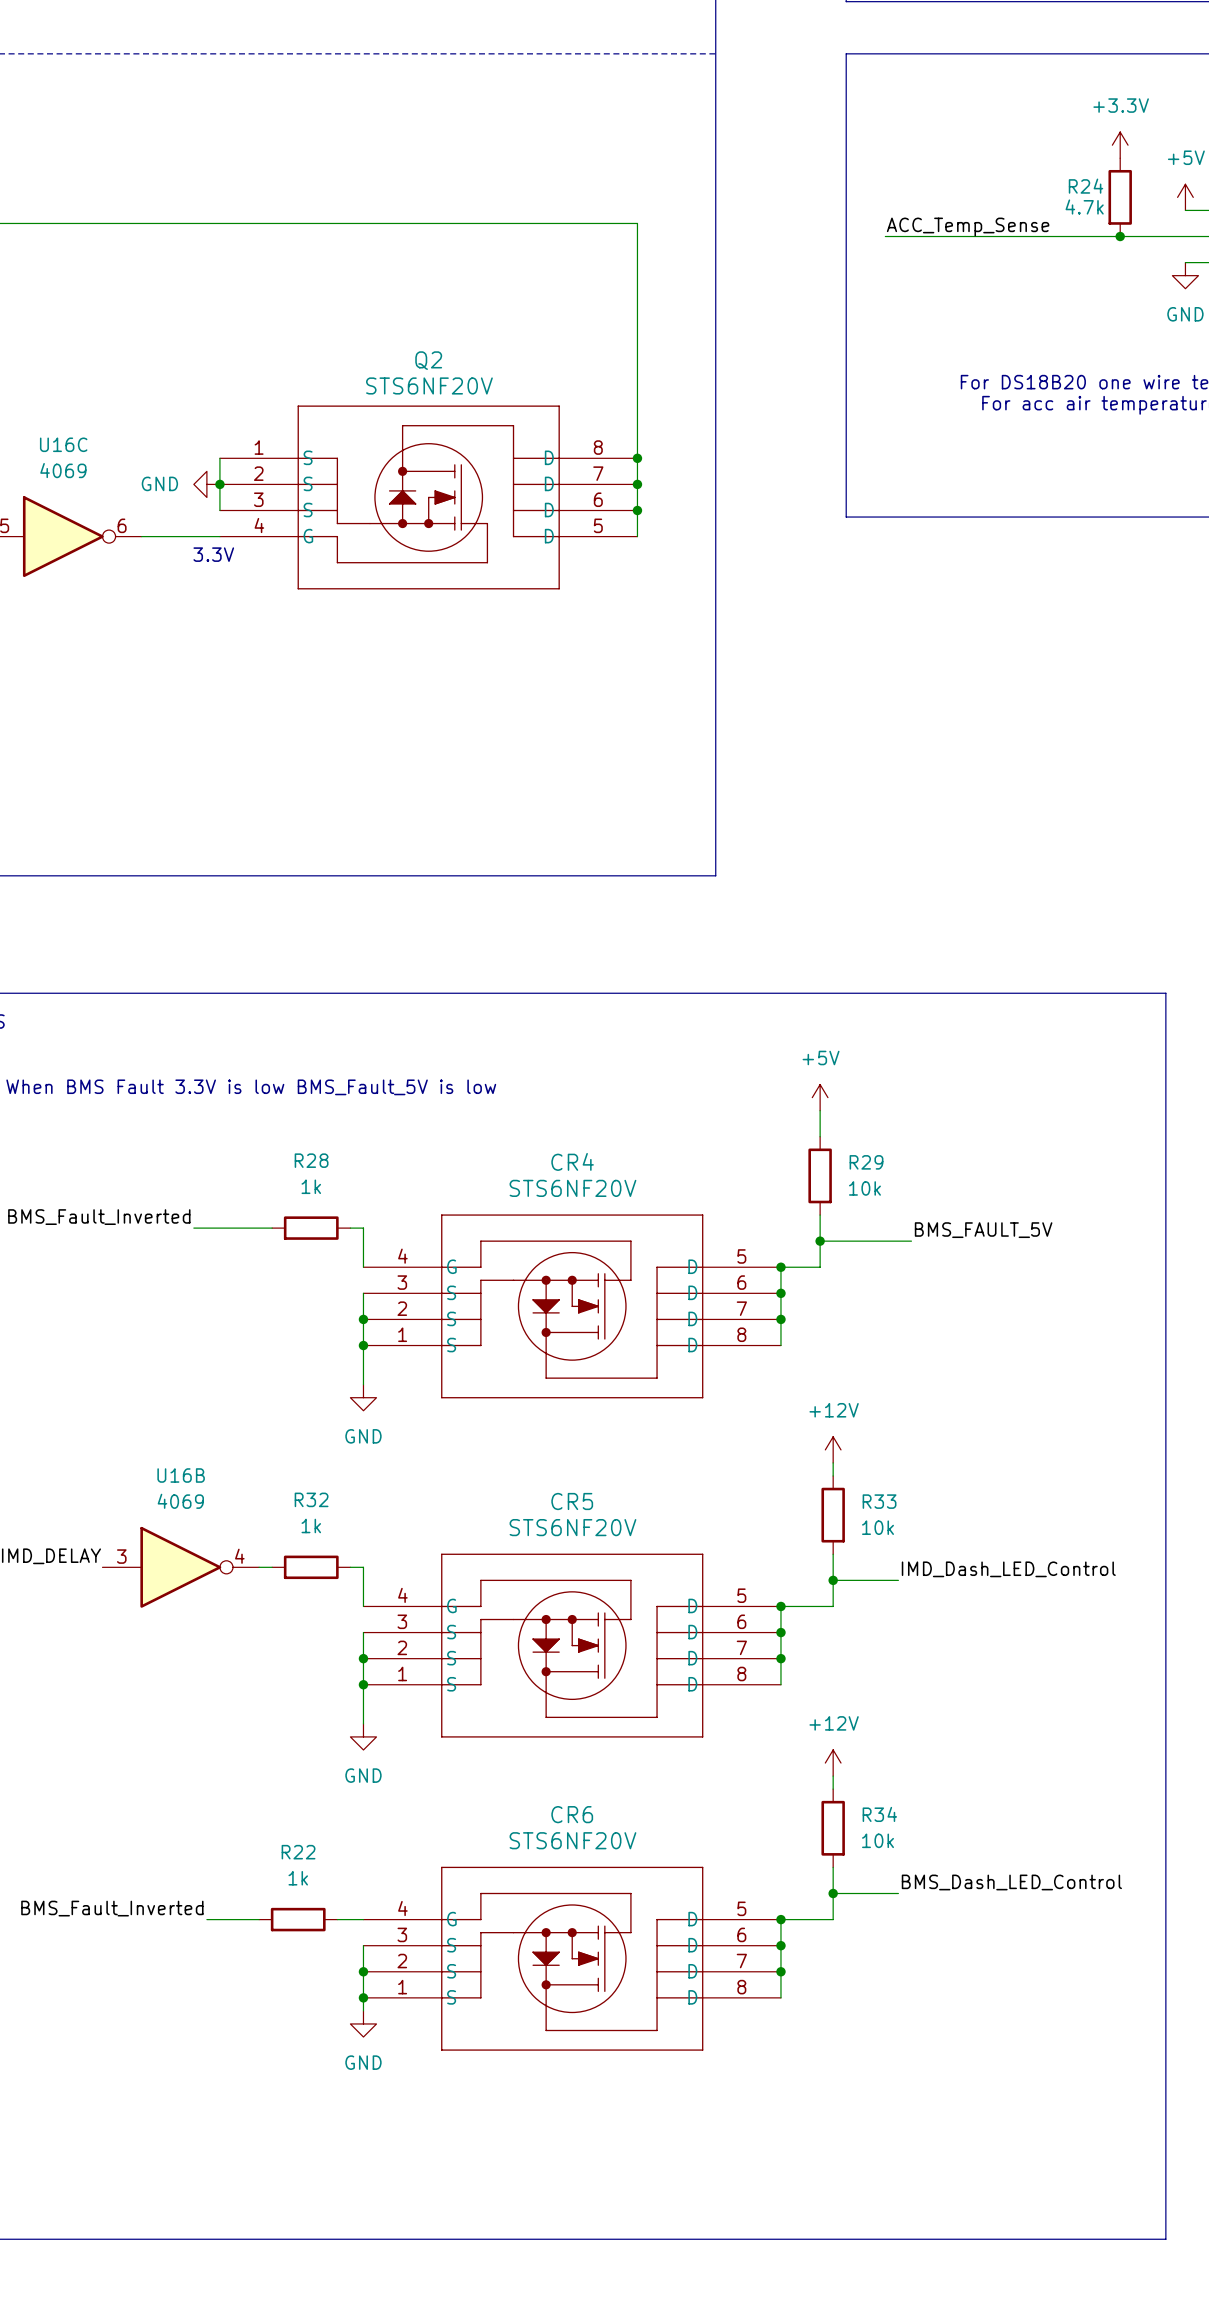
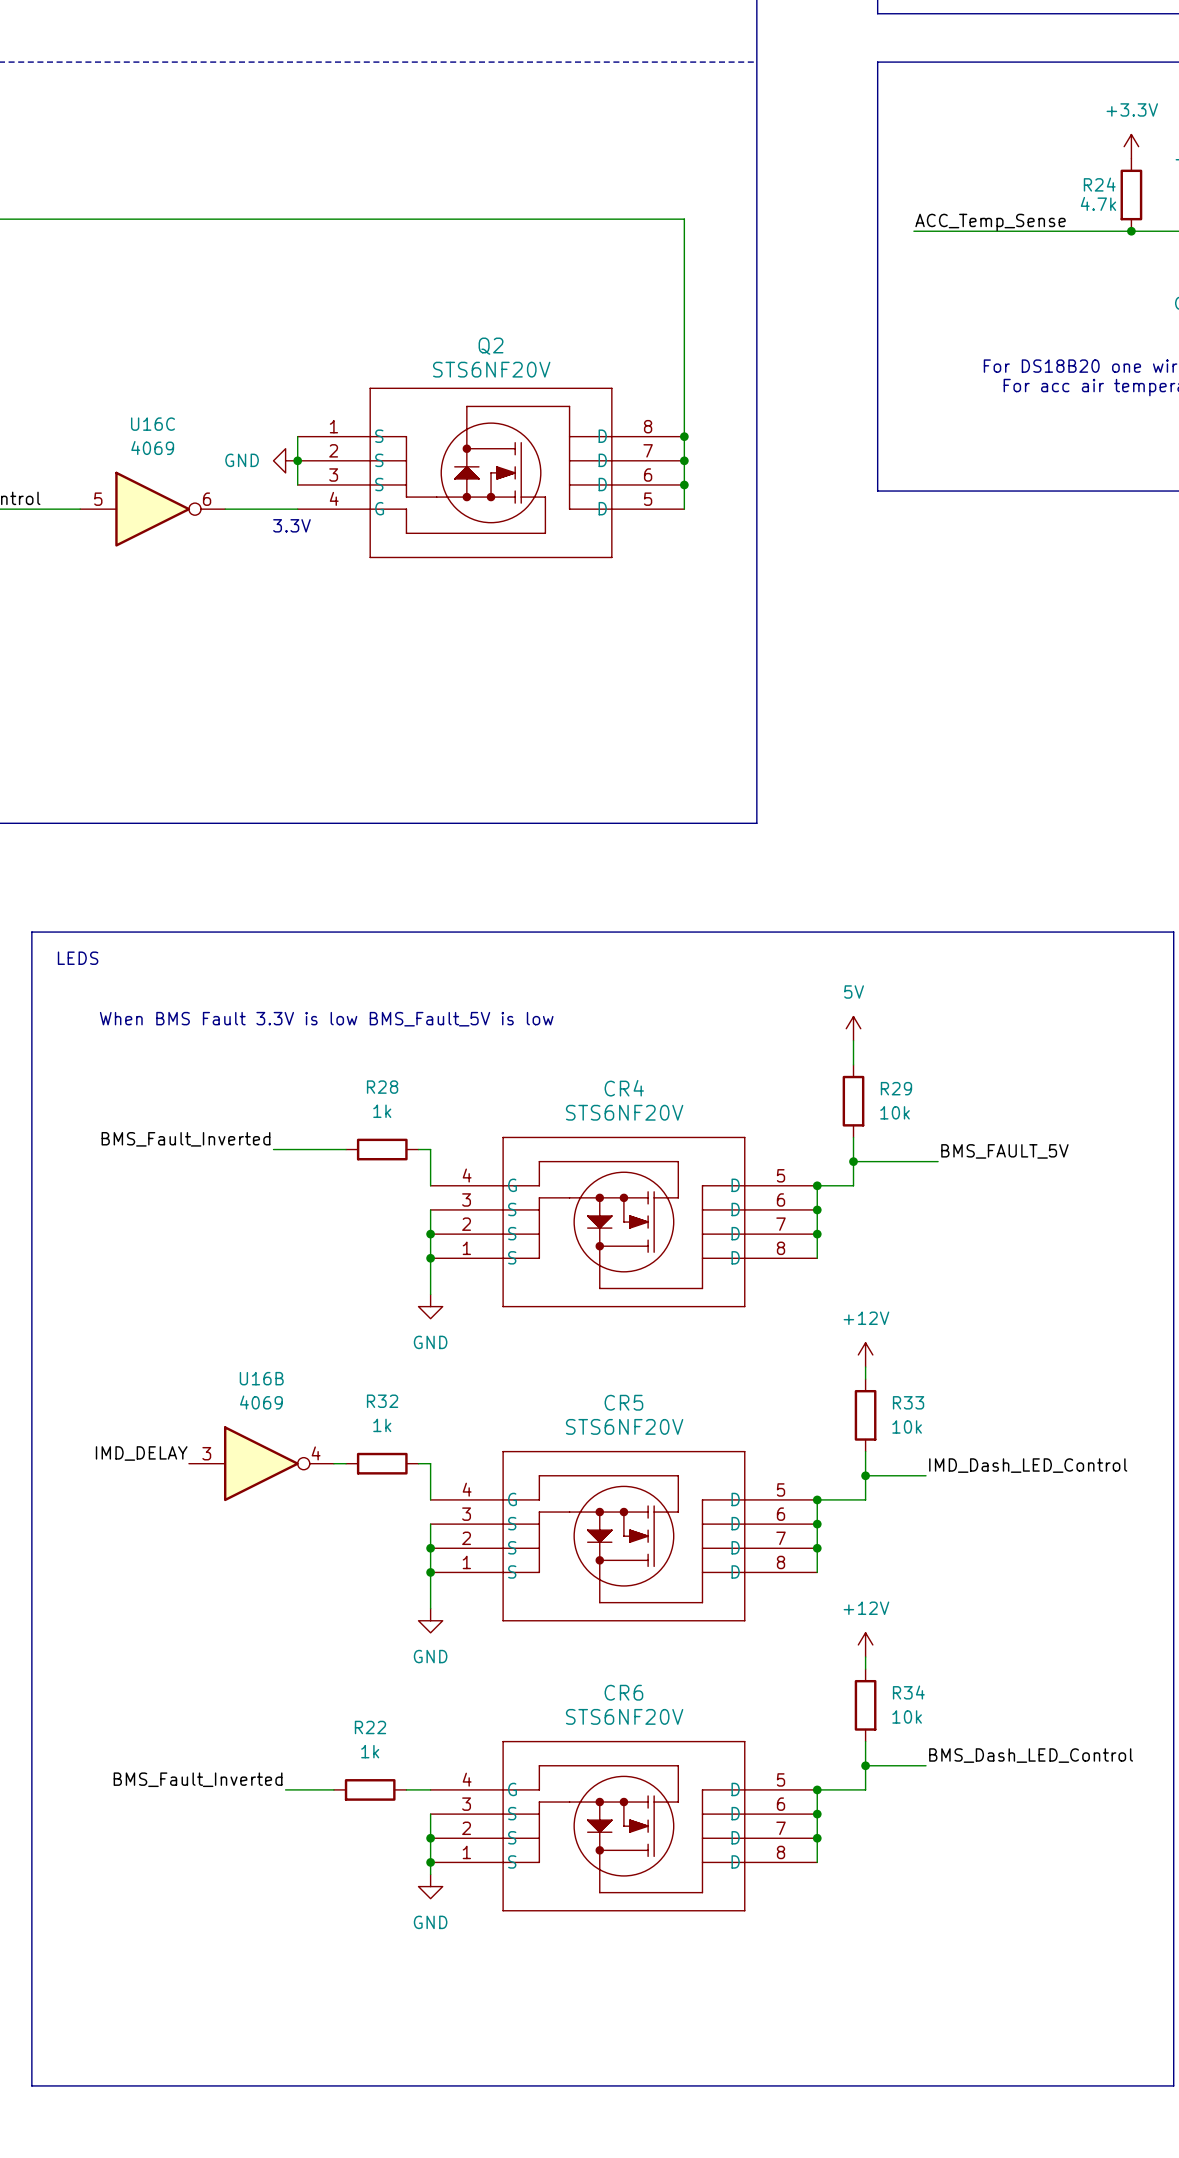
power symbol: +5V (820, 1097) -> 5V (853, 1028)

